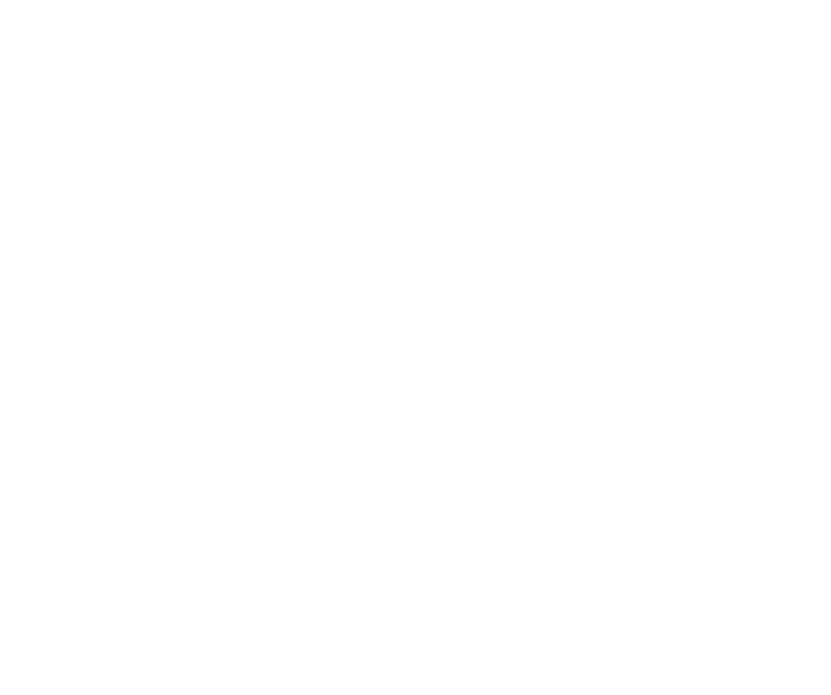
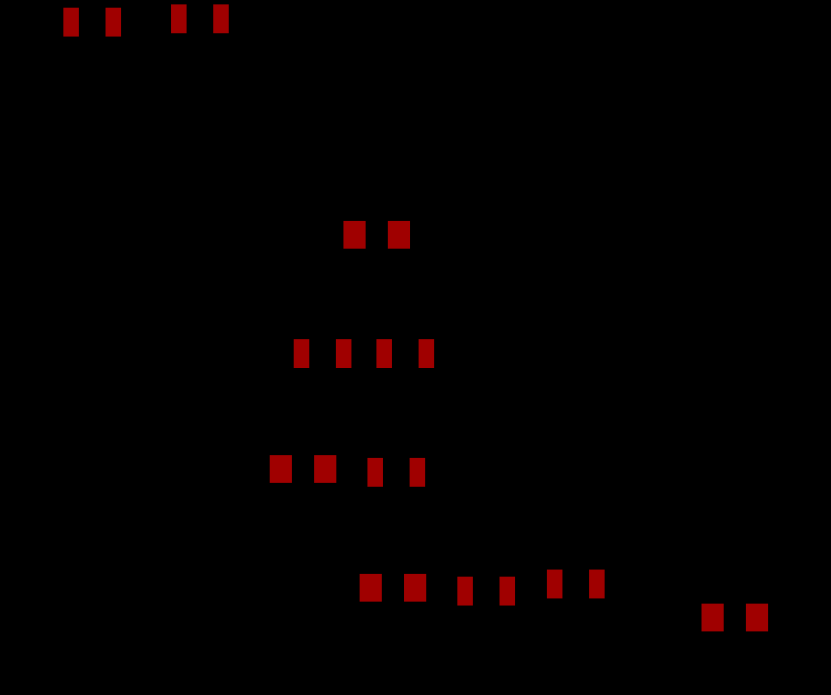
part: none -> (199, 18)
part: none -> (92, 22)
part: none -> (376, 234)
part: none -> (322, 353)
part: none -> (405, 353)
part: none -> (303, 469)
part: none -> (396, 472)
part: none -> (575, 583)
part: none -> (392, 587)
part: none -> (486, 591)
part: none -> (734, 617)

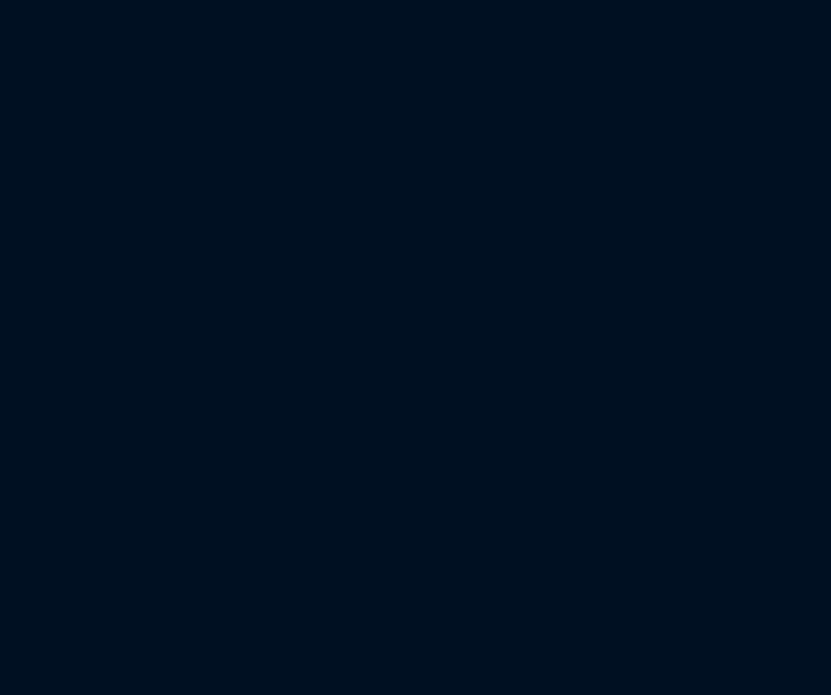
part: (199, 18) -> none
part: (92, 22) -> none
part: (376, 234) -> none
part: (322, 353) -> none
part: (405, 353) -> none
part: (303, 469) -> none
part: (396, 472) -> none
part: (575, 583) -> none
part: (392, 587) -> none
part: (486, 591) -> none
part: (734, 617) -> none

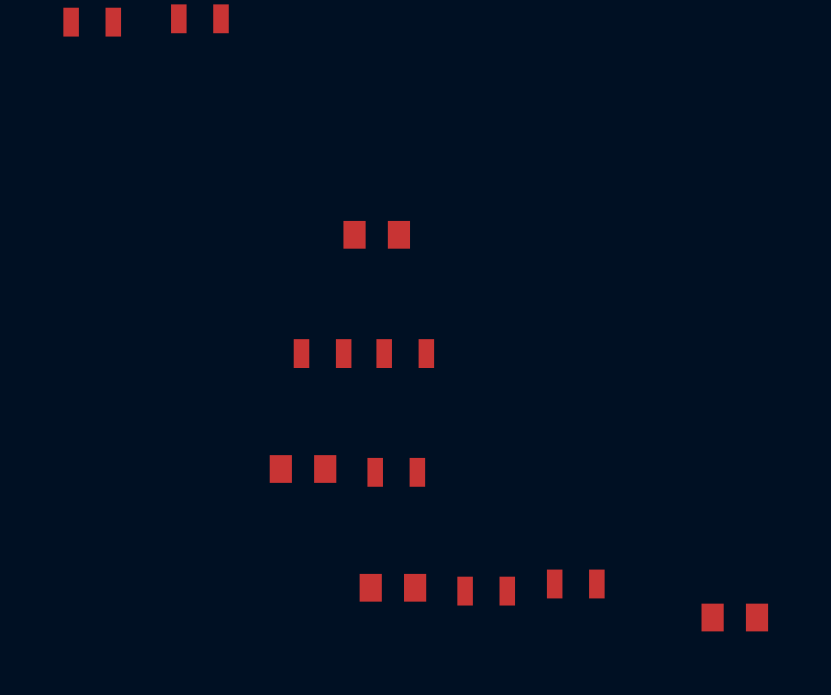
part: none -> (199, 18)
part: none -> (92, 22)
part: none -> (376, 234)
part: none -> (322, 353)
part: none -> (405, 353)
part: none -> (303, 469)
part: none -> (396, 472)
part: none -> (575, 583)
part: none -> (392, 587)
part: none -> (486, 591)
part: none -> (734, 617)

